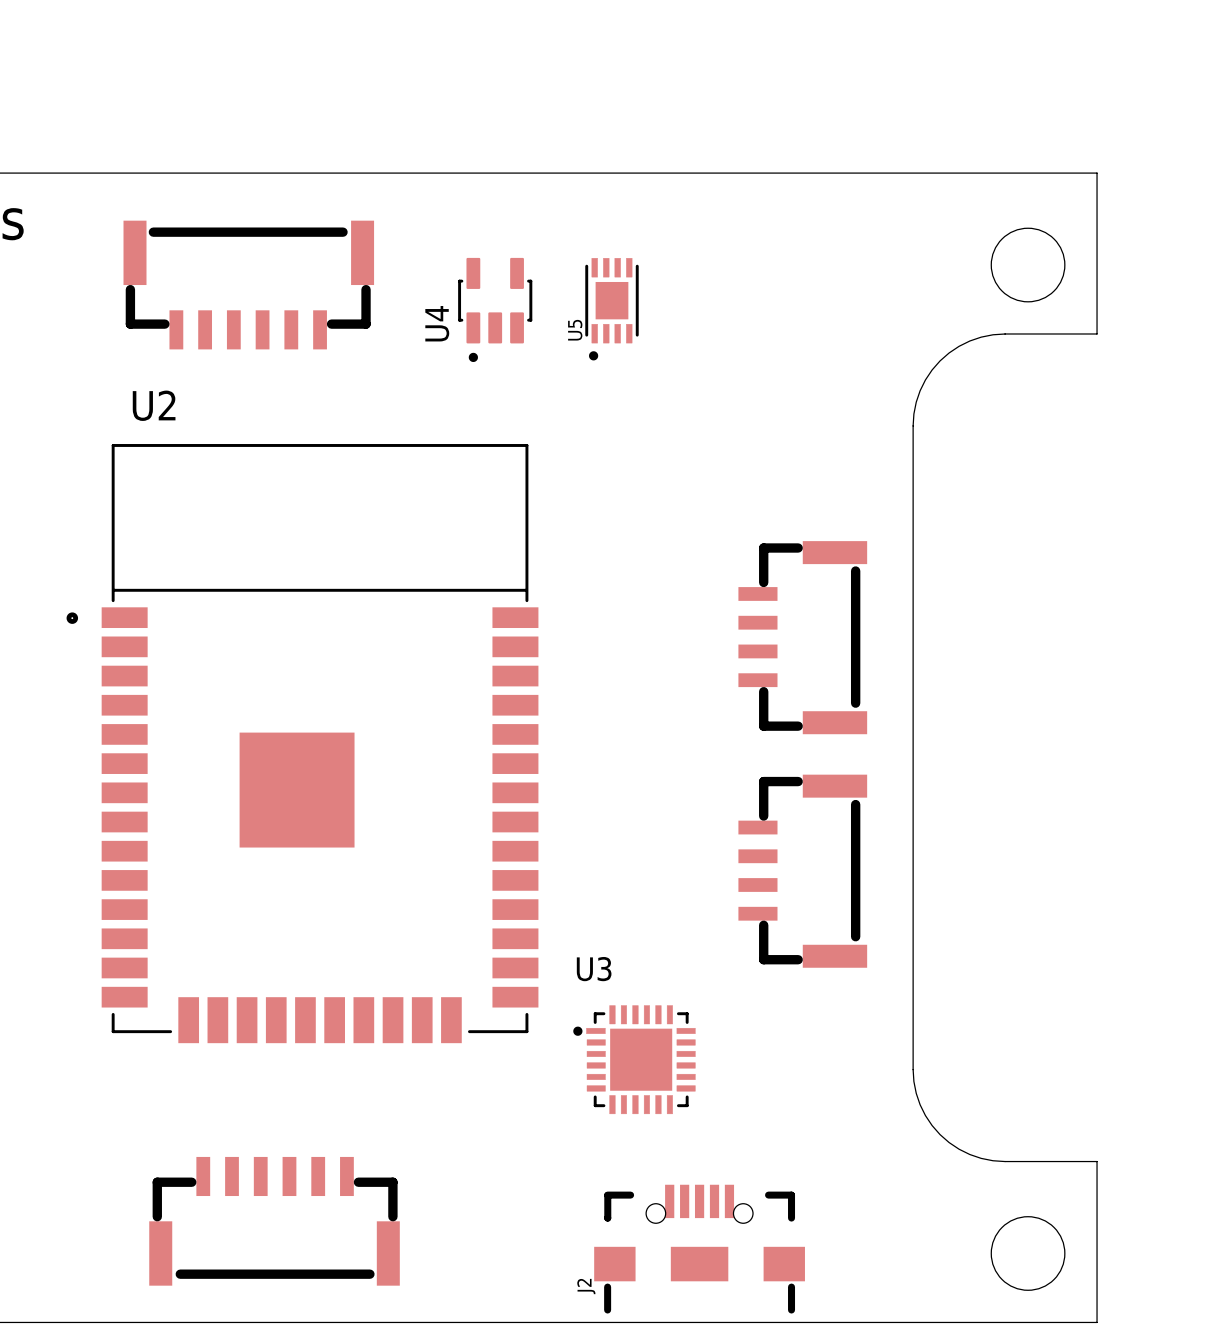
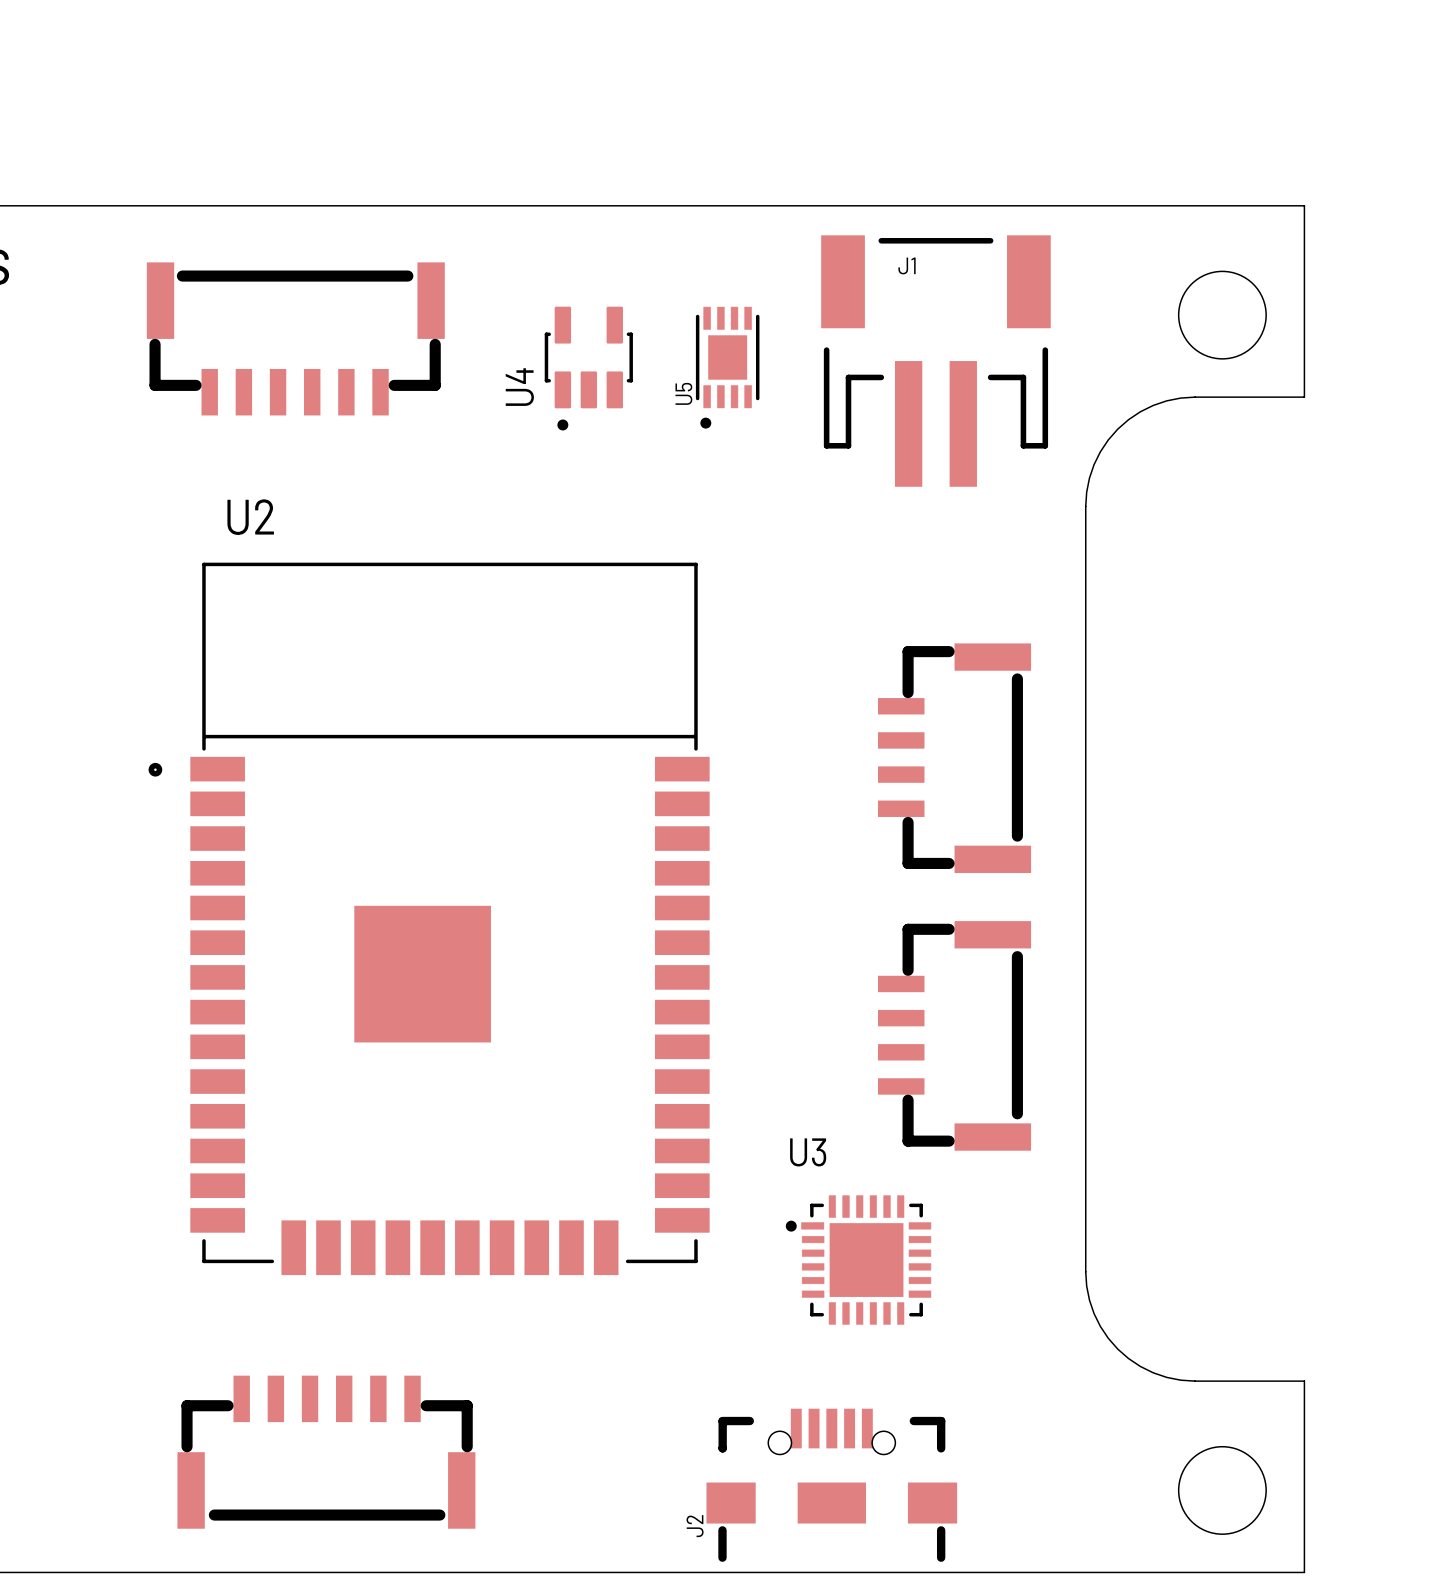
J1: none -> (935, 361)
U2 position: (302, 743) -> (429, 918)
U3 position: (634, 1059) -> (858, 1260)

